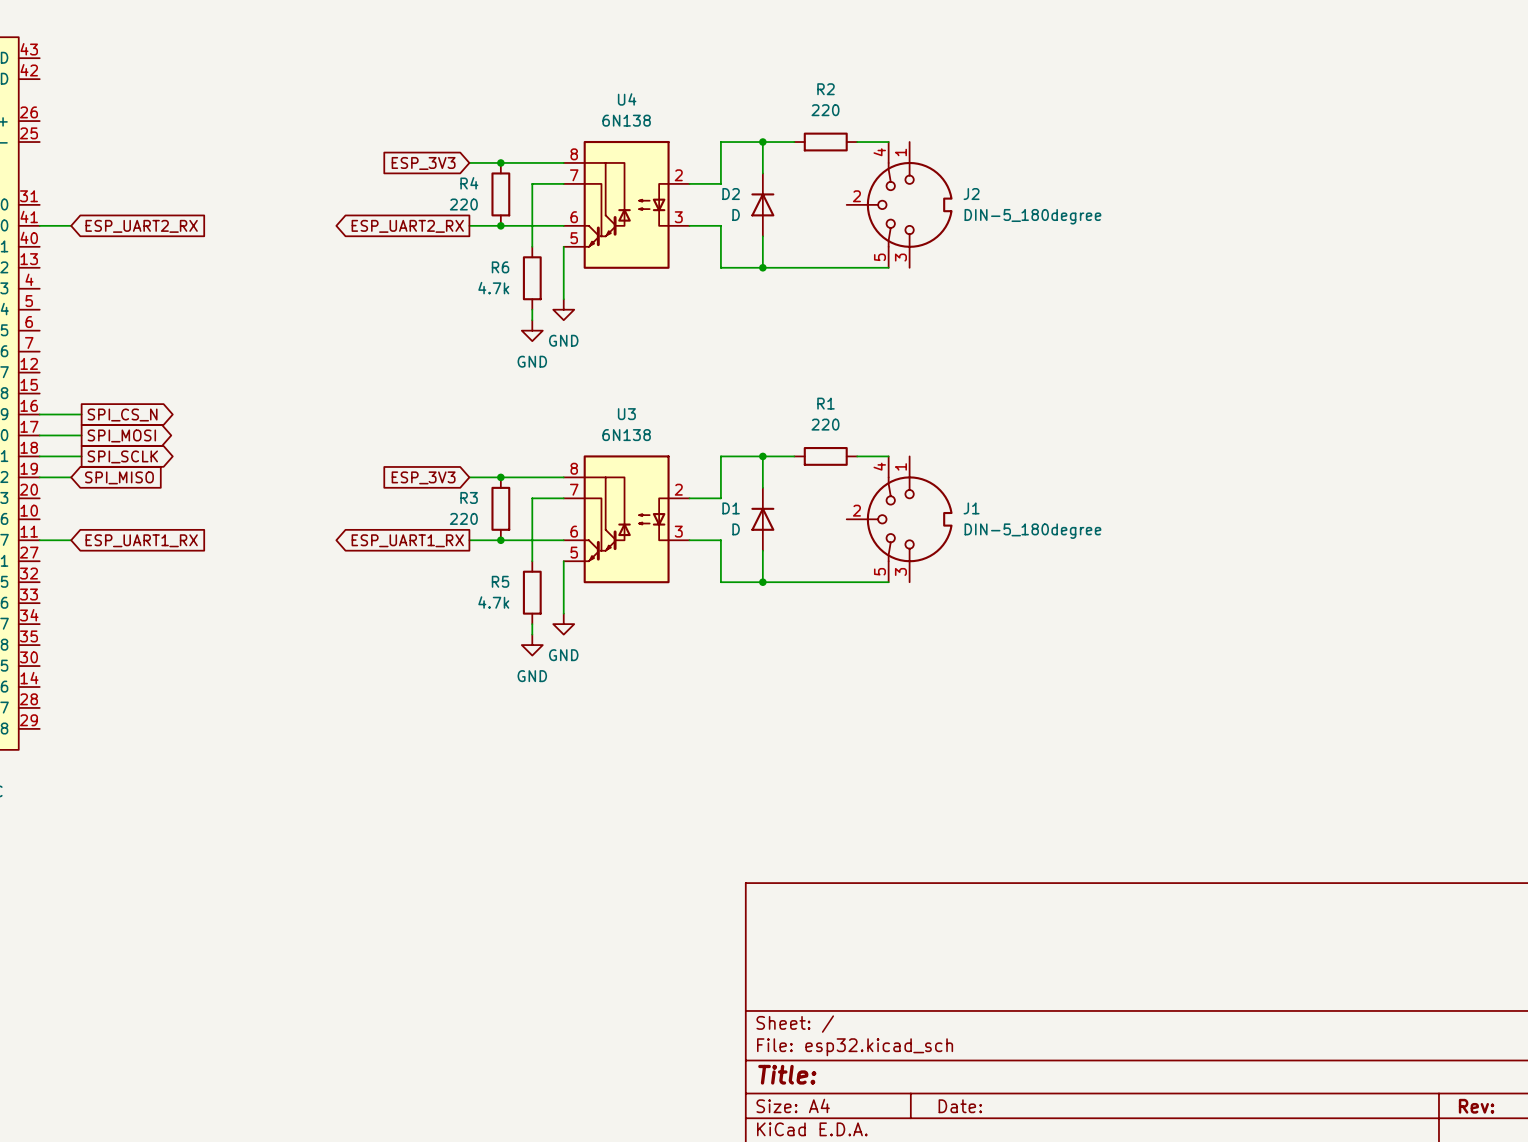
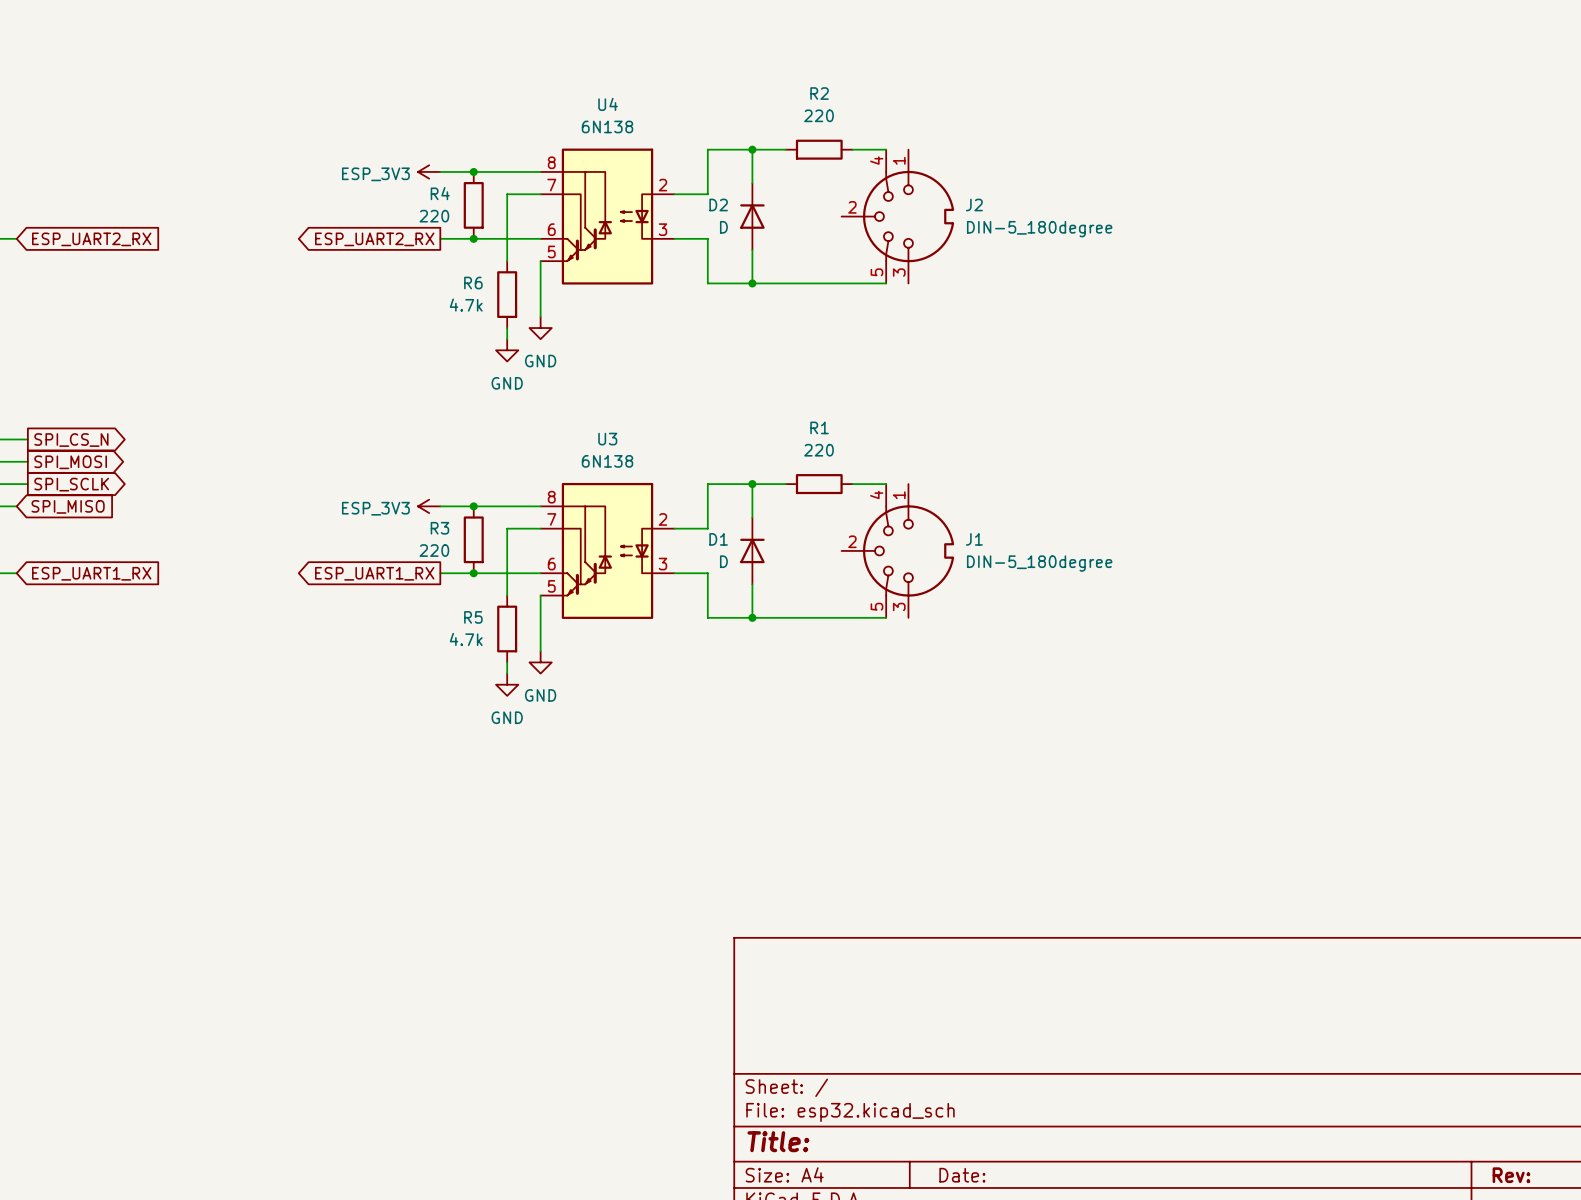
power symbol: none -> ESP_3V3 (429, 171)
global label: ESP_3V3 (423, 163) -> none
global label: ESP_3V3 (423, 477) -> none
power symbol: none -> ESP_3V3 (429, 506)

